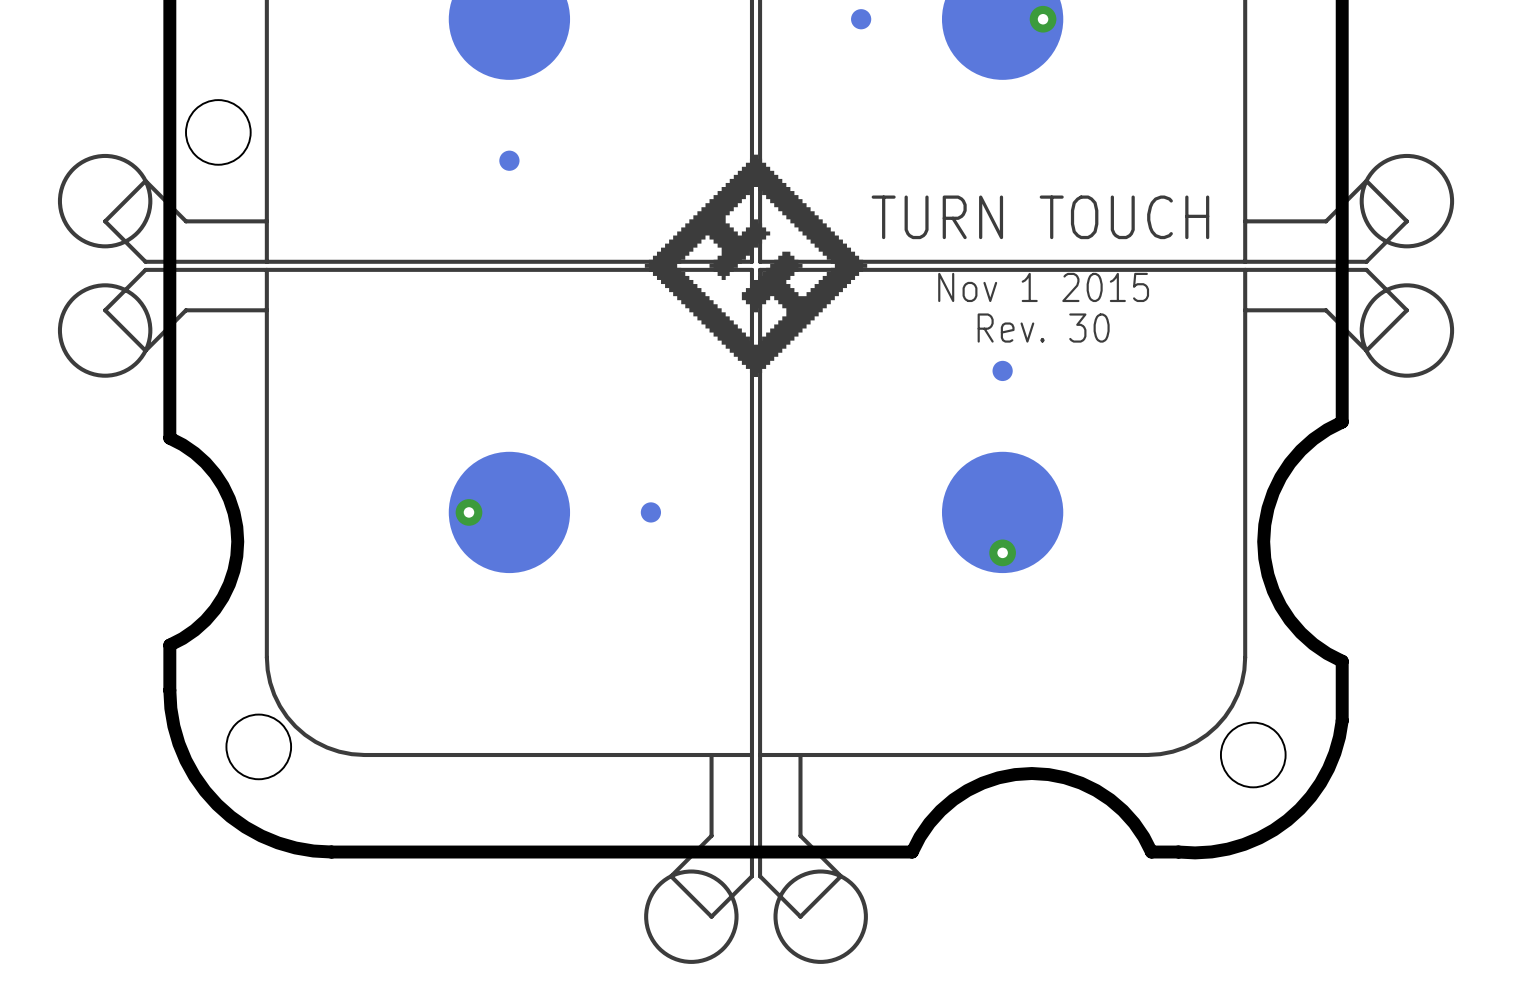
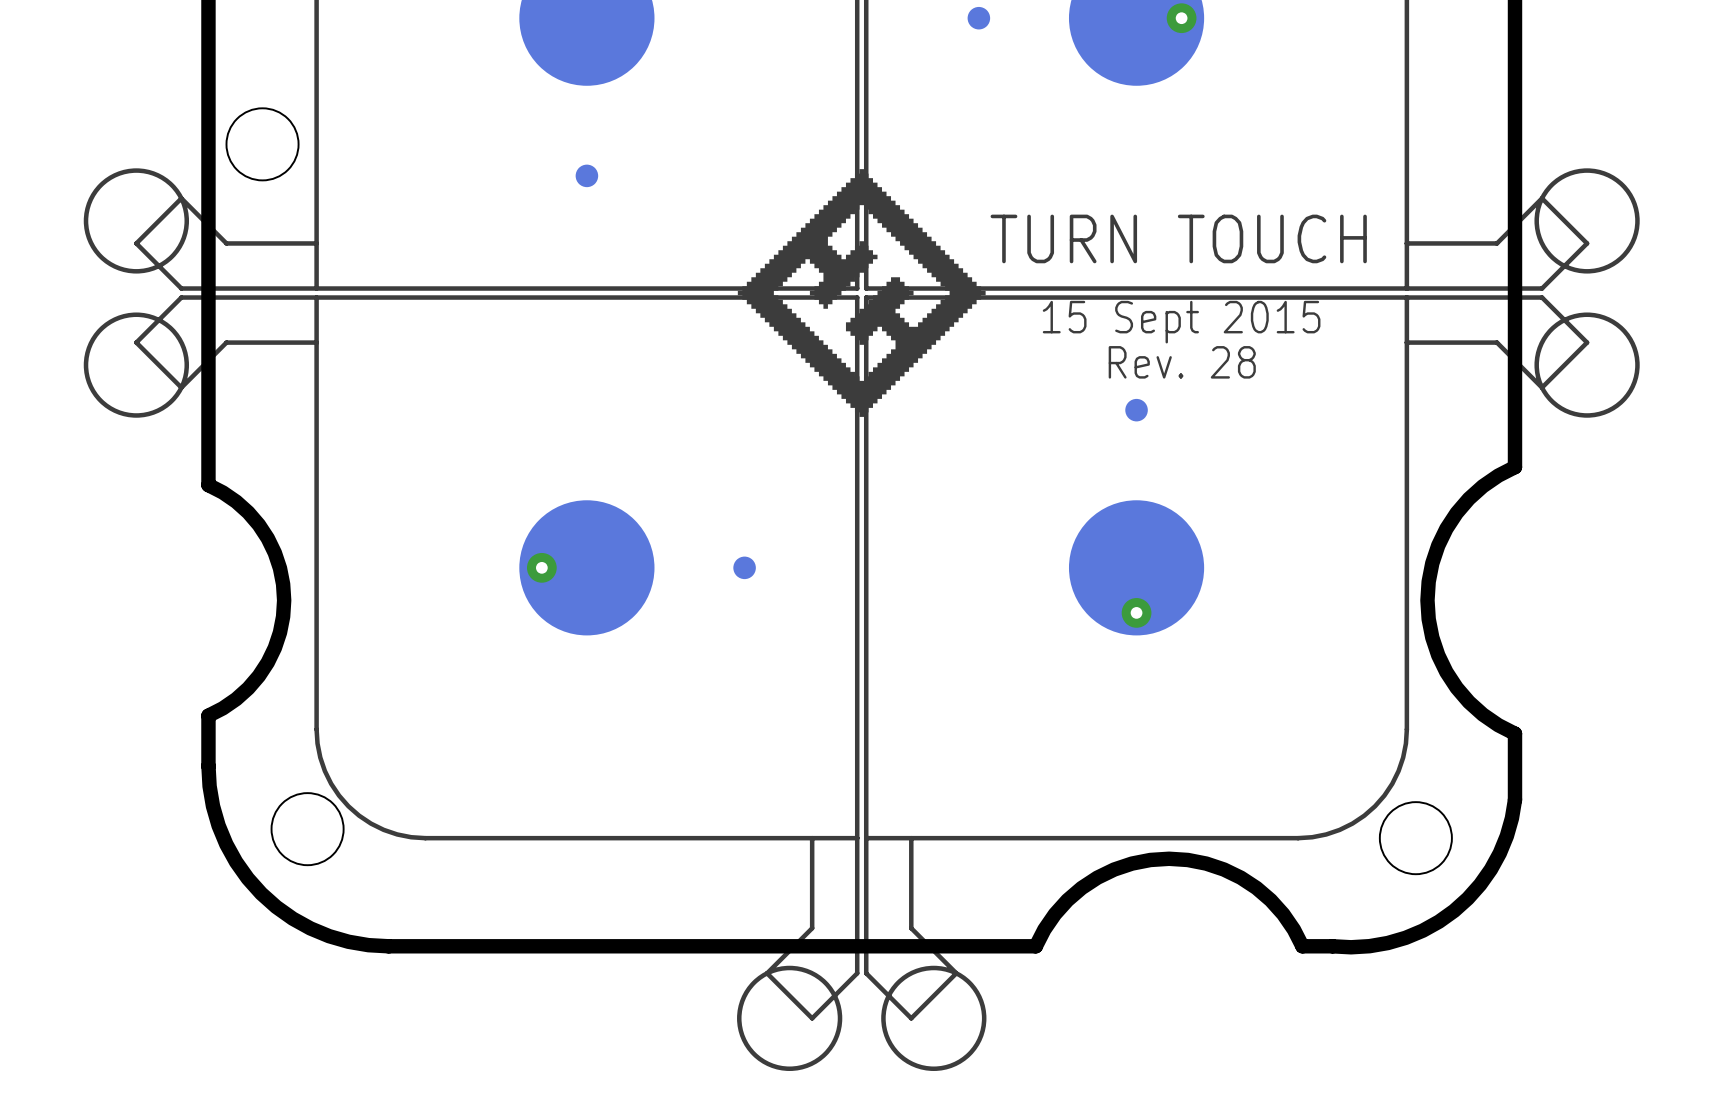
text: Nov 1 2015 (1043, 287) -> 15 Sept 2015 (1181, 322)
text: Rev. 30 (1043, 328) -> Rev. 28 (1182, 362)

